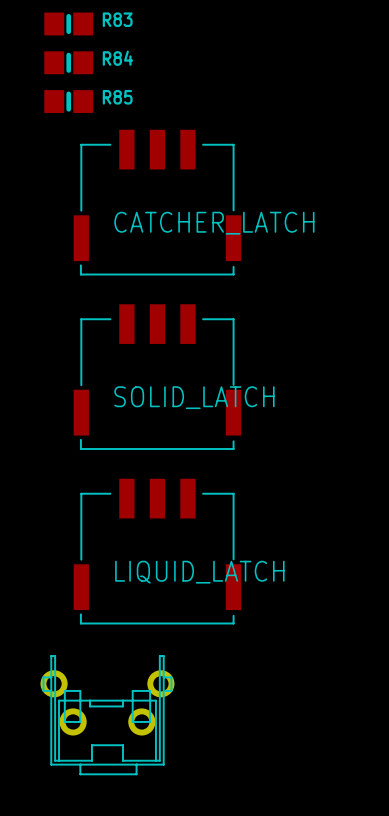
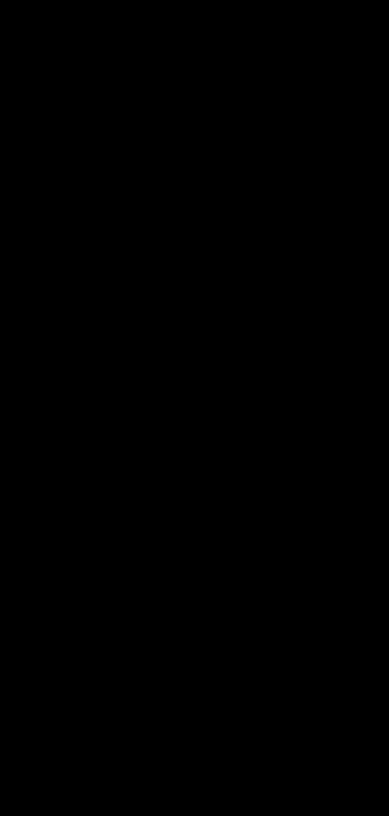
R83: (68, 23) -> none
R84: (68, 62) -> none
R85: (68, 101) -> none
CATCHER_LATCH: (157, 202) -> none
SOLID_LATCH: (157, 377) -> none
LIQUID_LATCH: (157, 551) -> none
part: (107, 715) -> none

